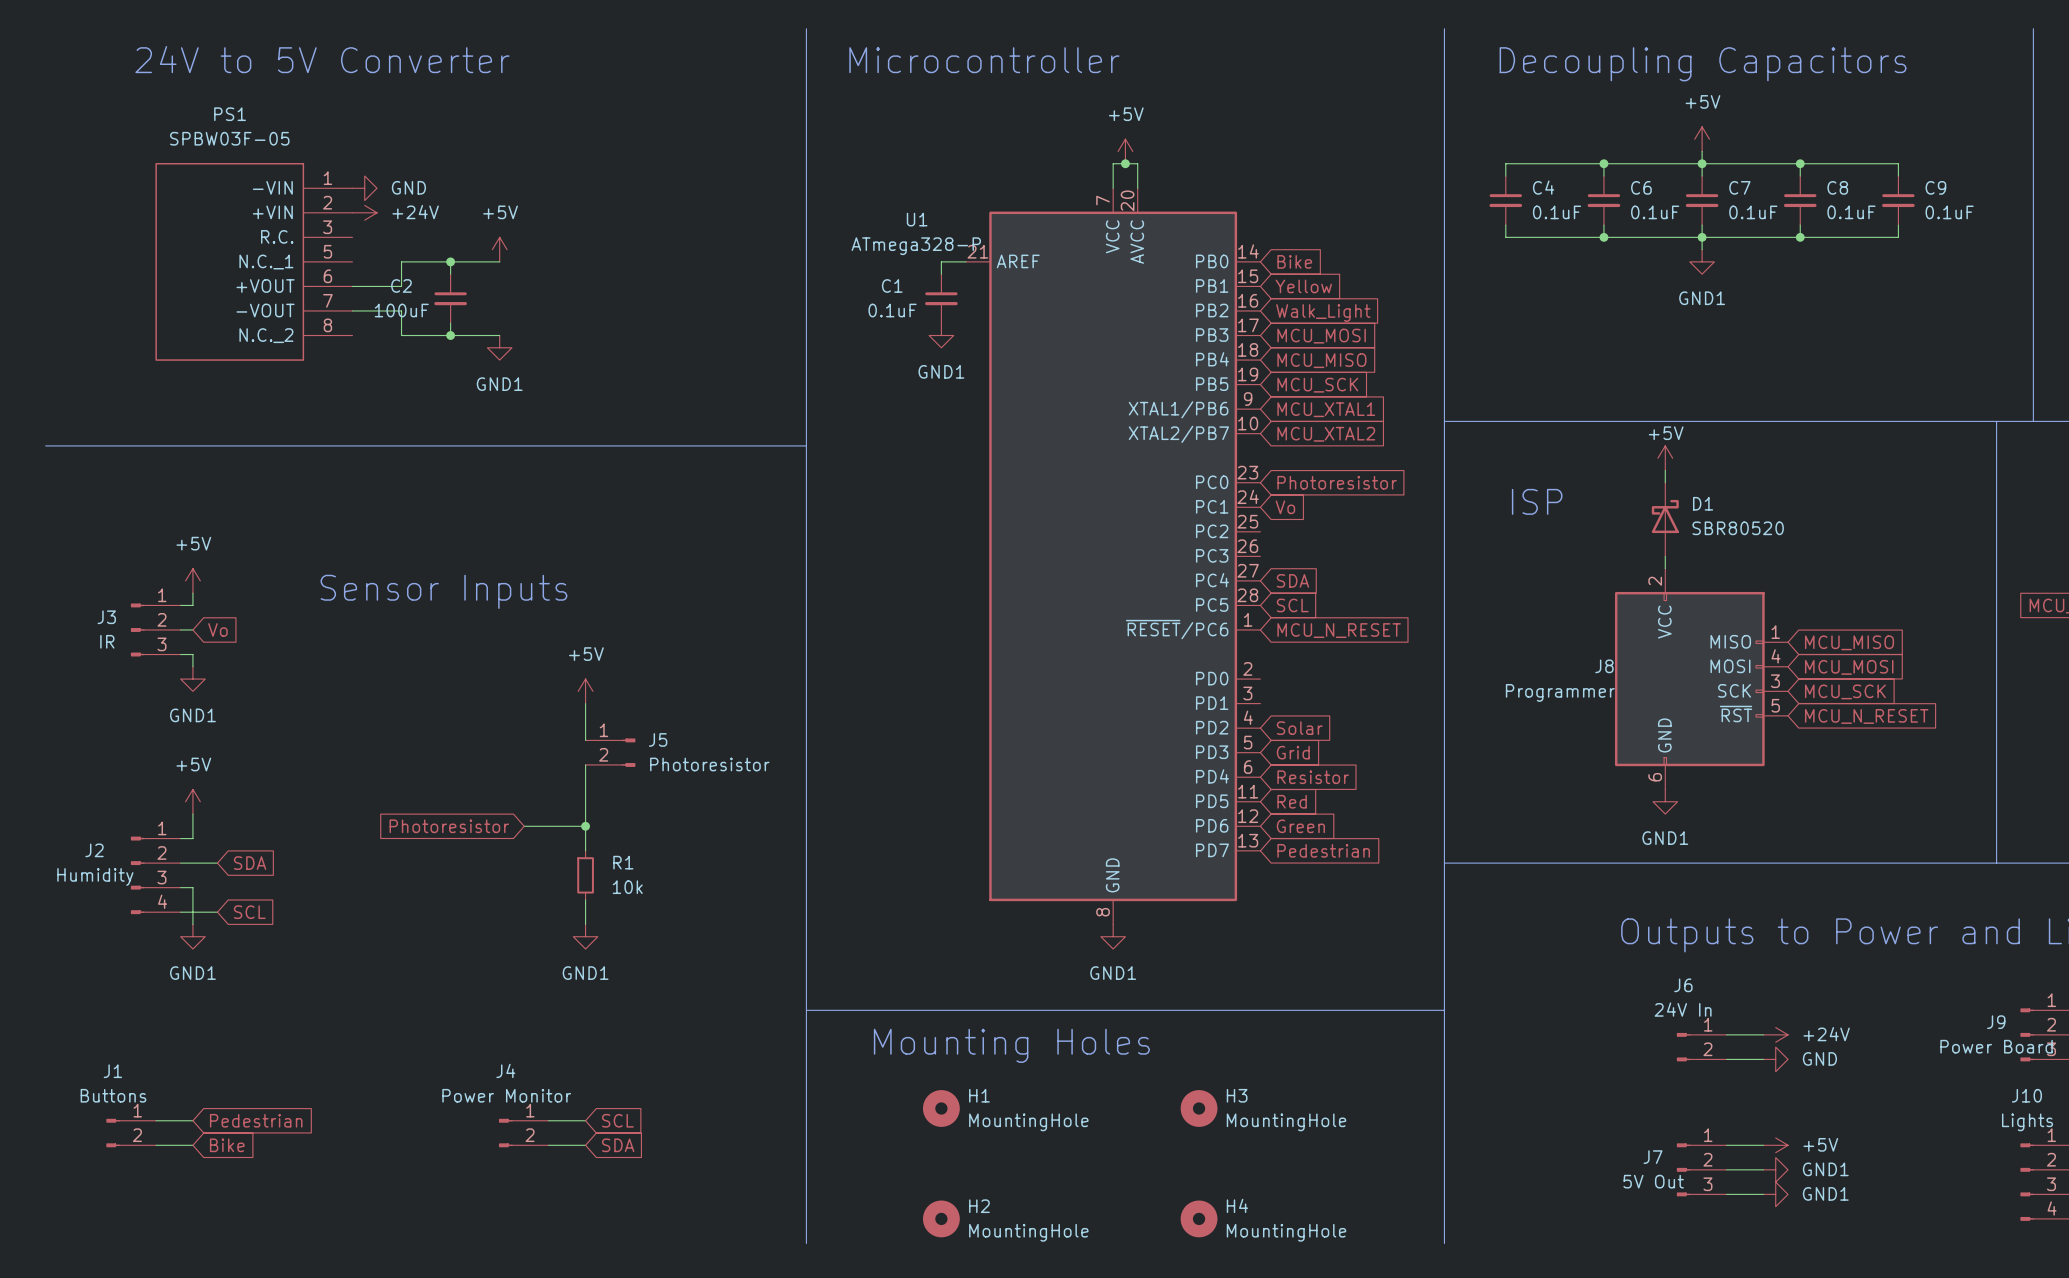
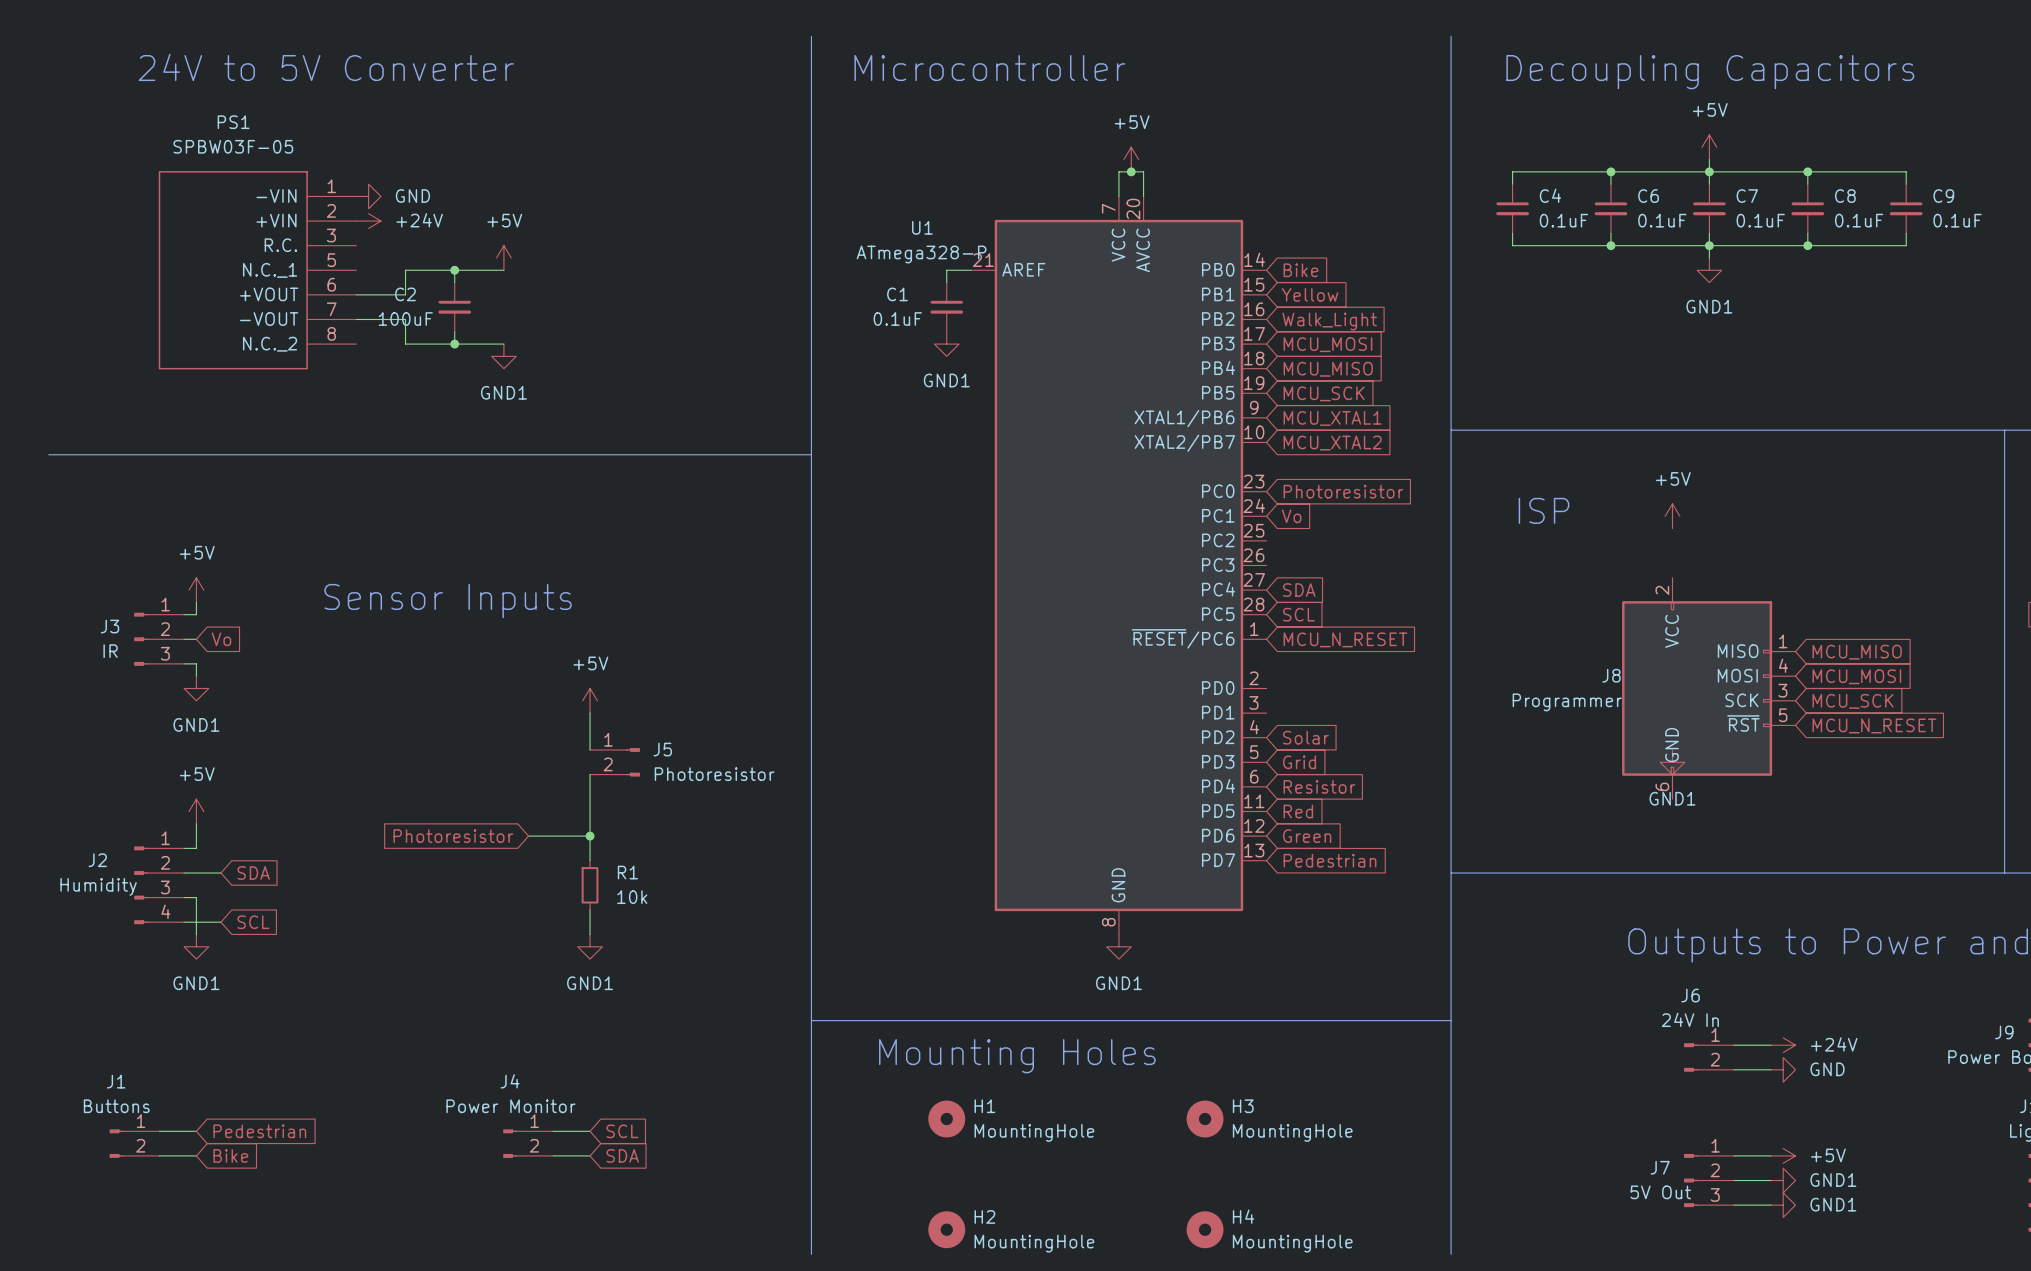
power symbol text position: +5V (1666, 433) -> +5V (1673, 478)
power symbol position: +5V (1665, 458) -> +5V (1672, 516)
wire: (1665, 470) (1665, 482) -> none
D1: SBR80520 (1665, 519) -> none
wire: (1665, 556) (1665, 568) -> none
power symbol position: GND1 (1665, 801) -> GND1 (1672, 762)

